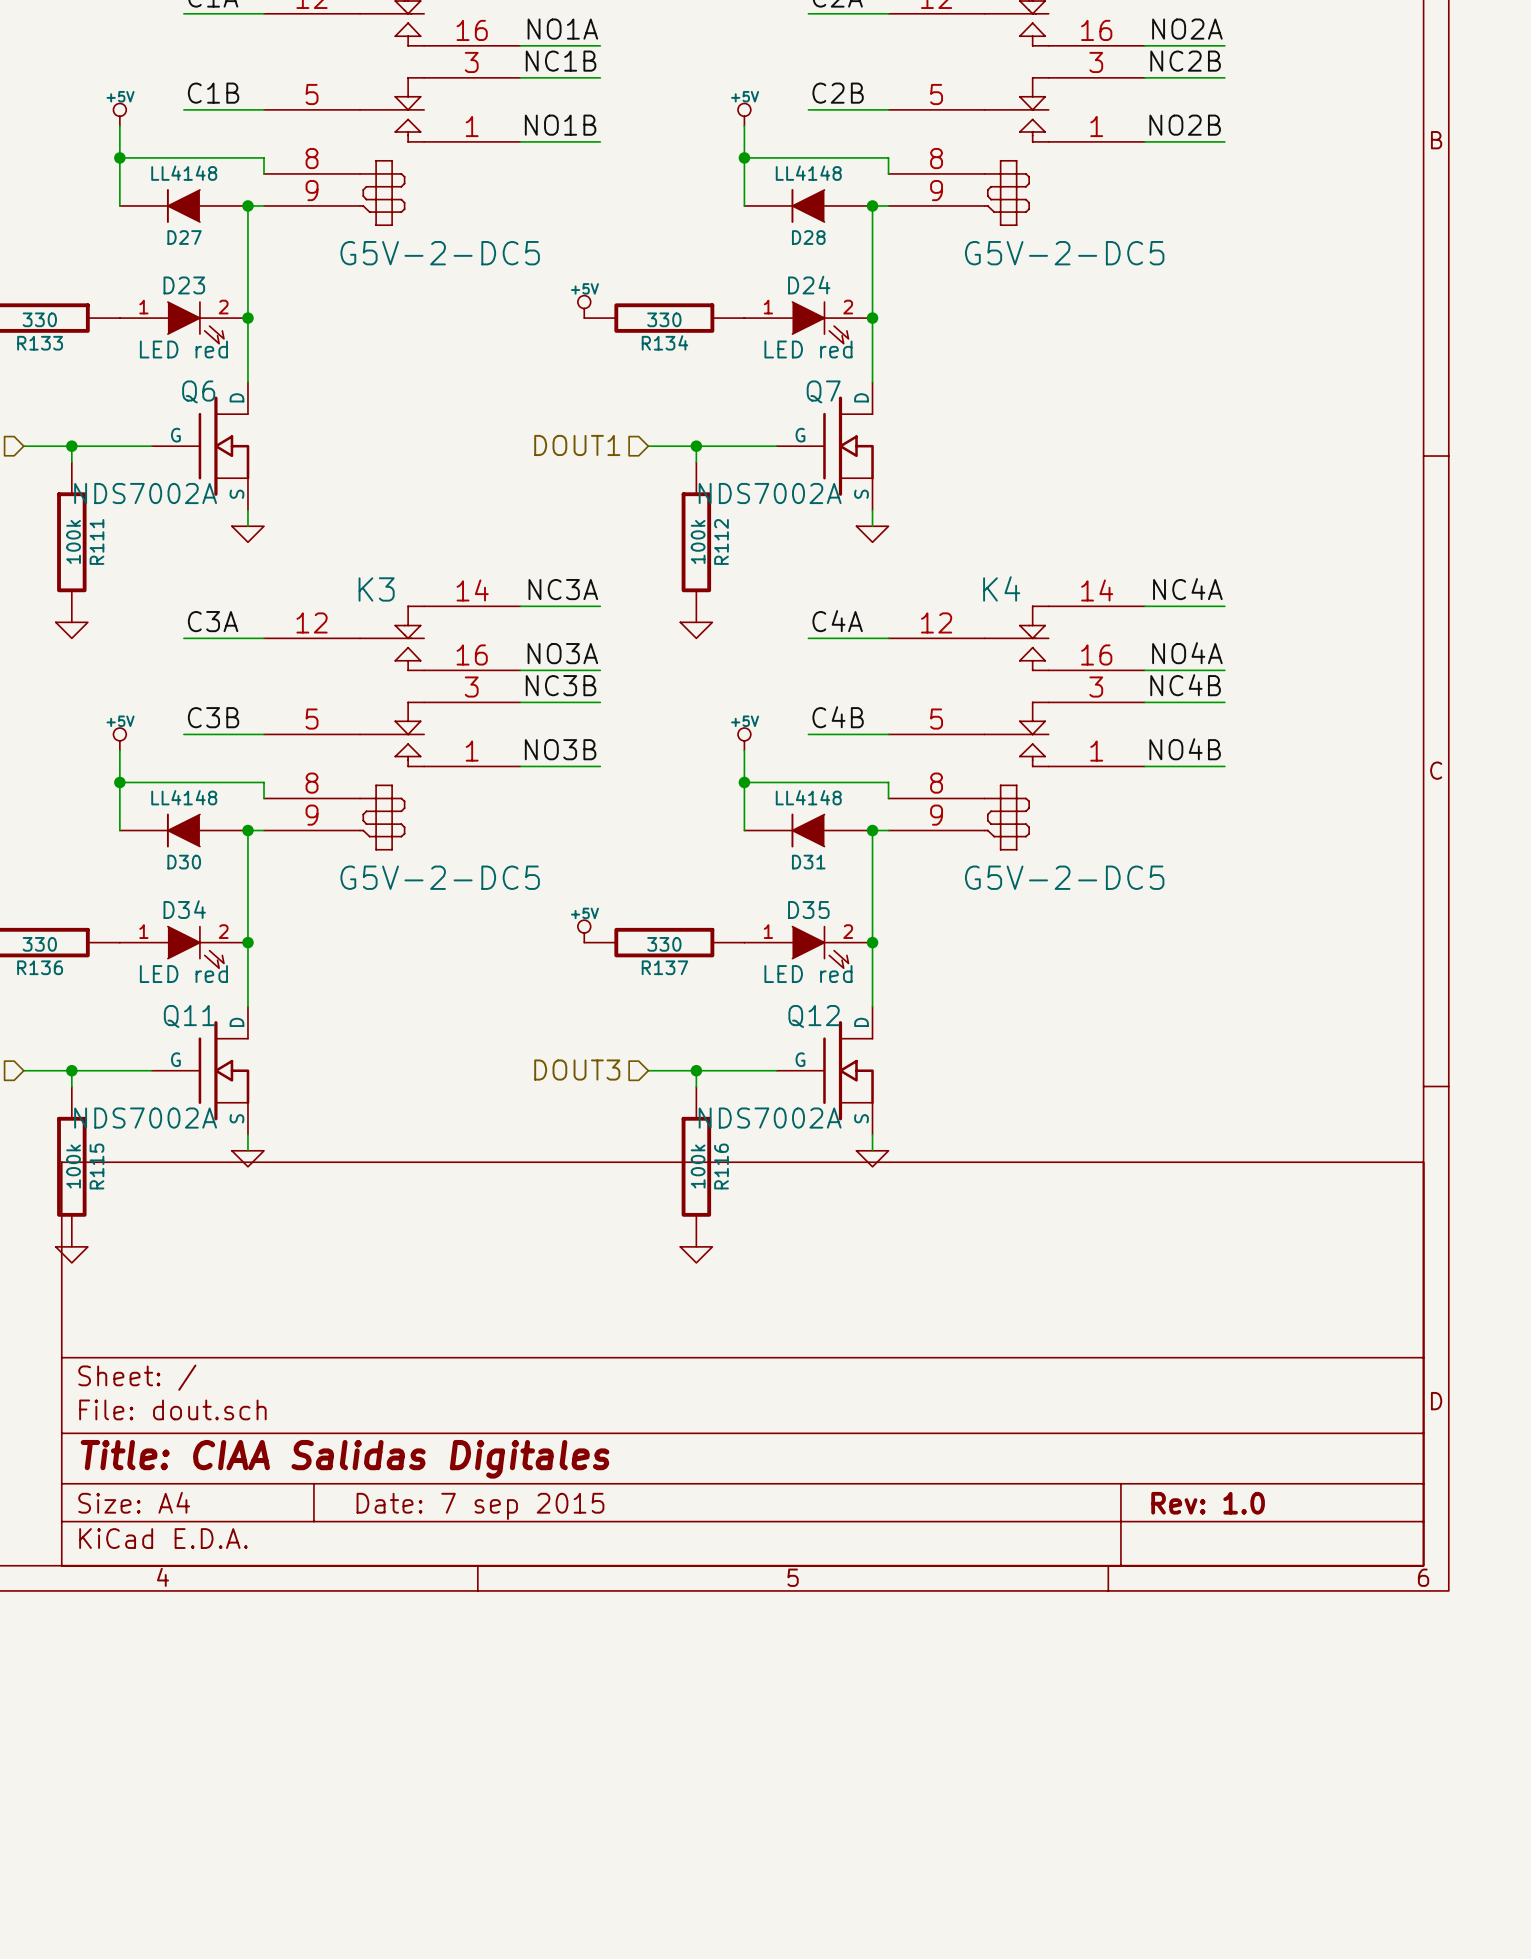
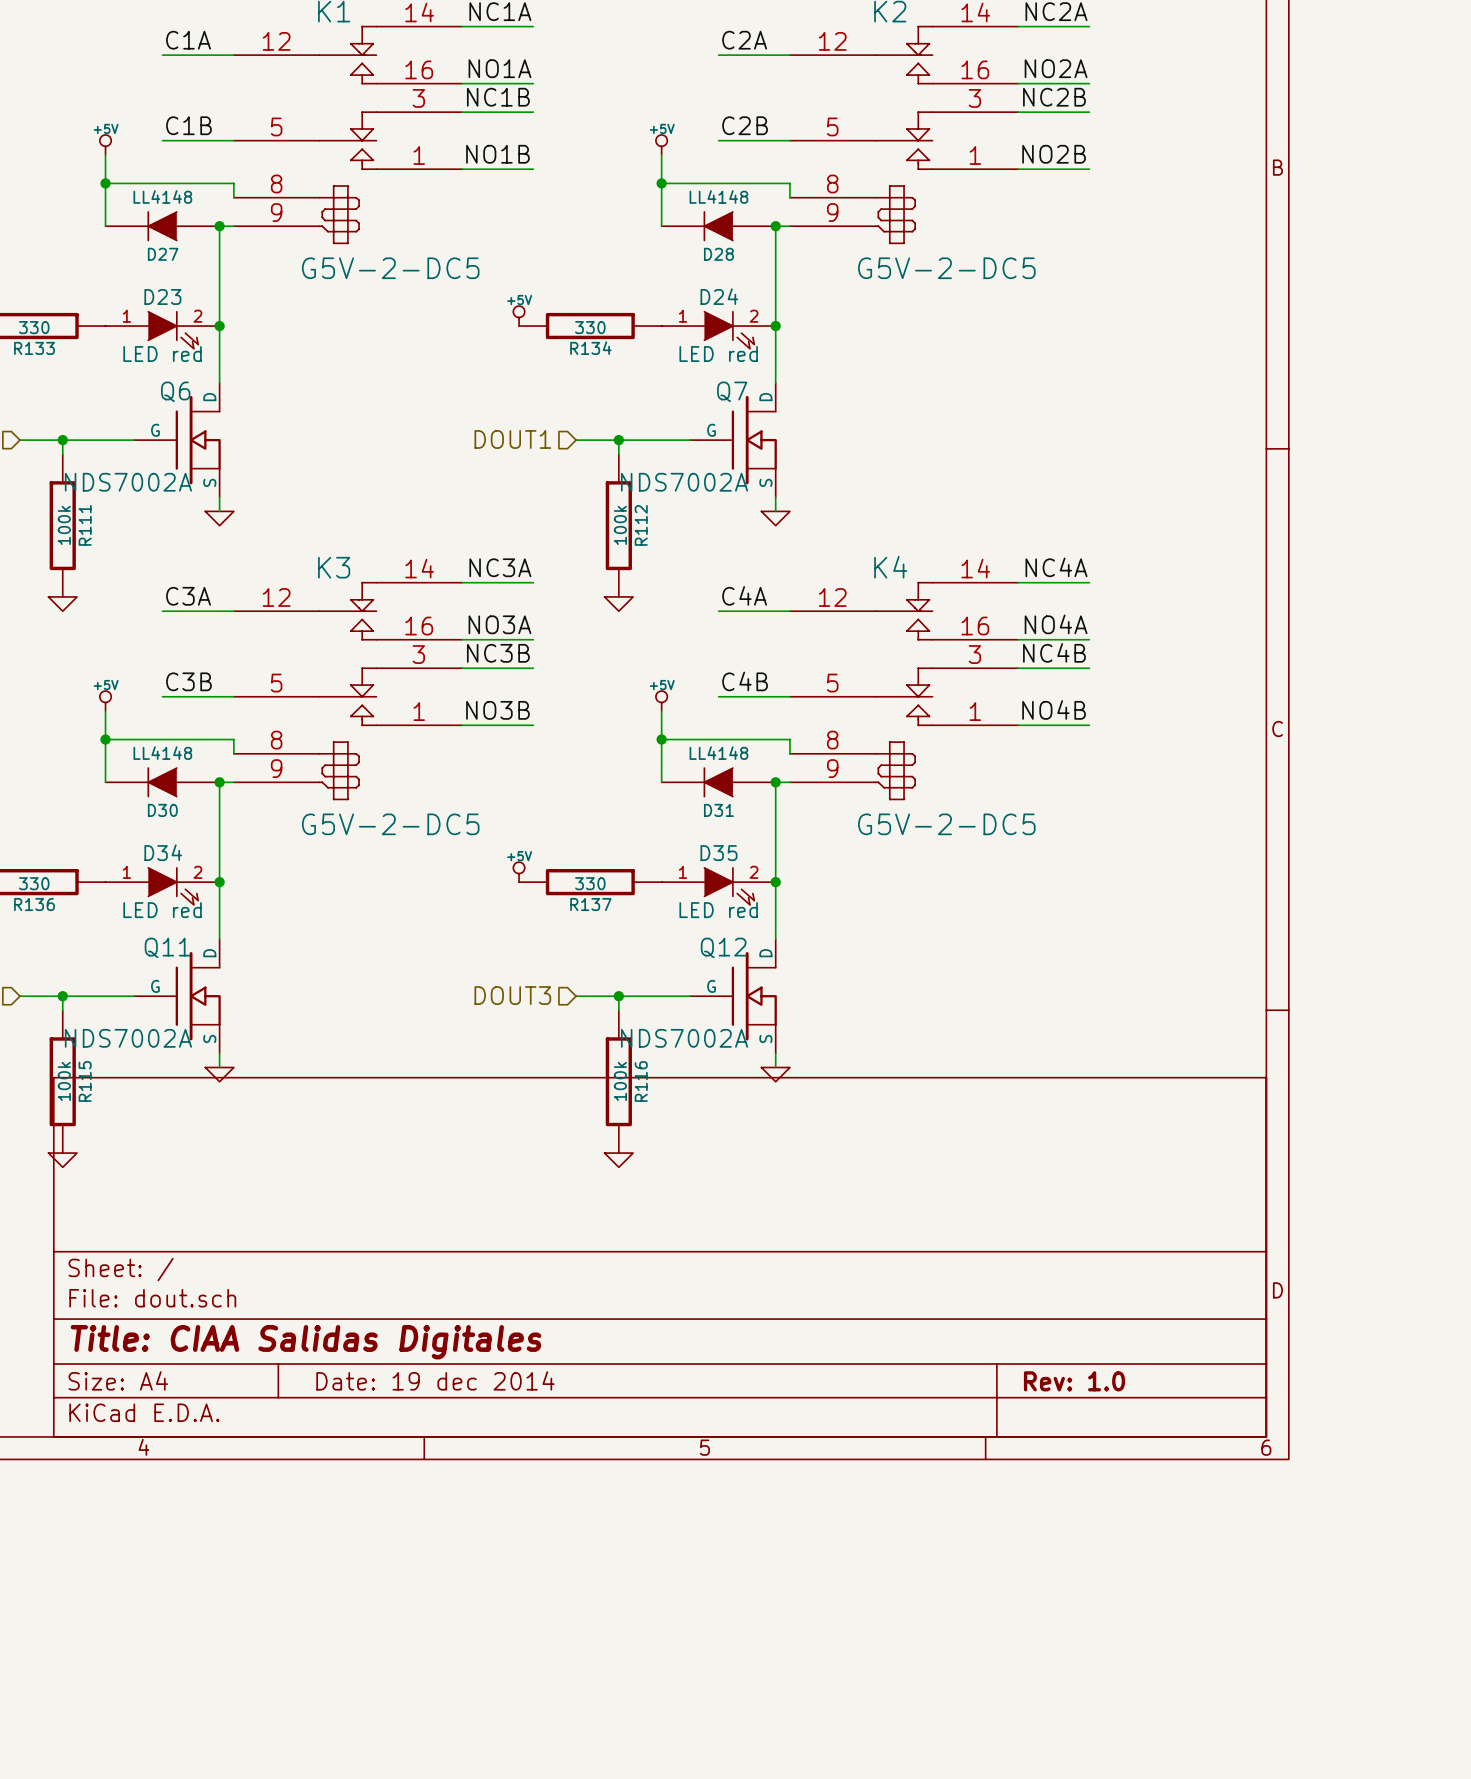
title block: Date: 7 sep 2015 (480, 1506) -> Date: 19 dec 2014 (435, 1380)

